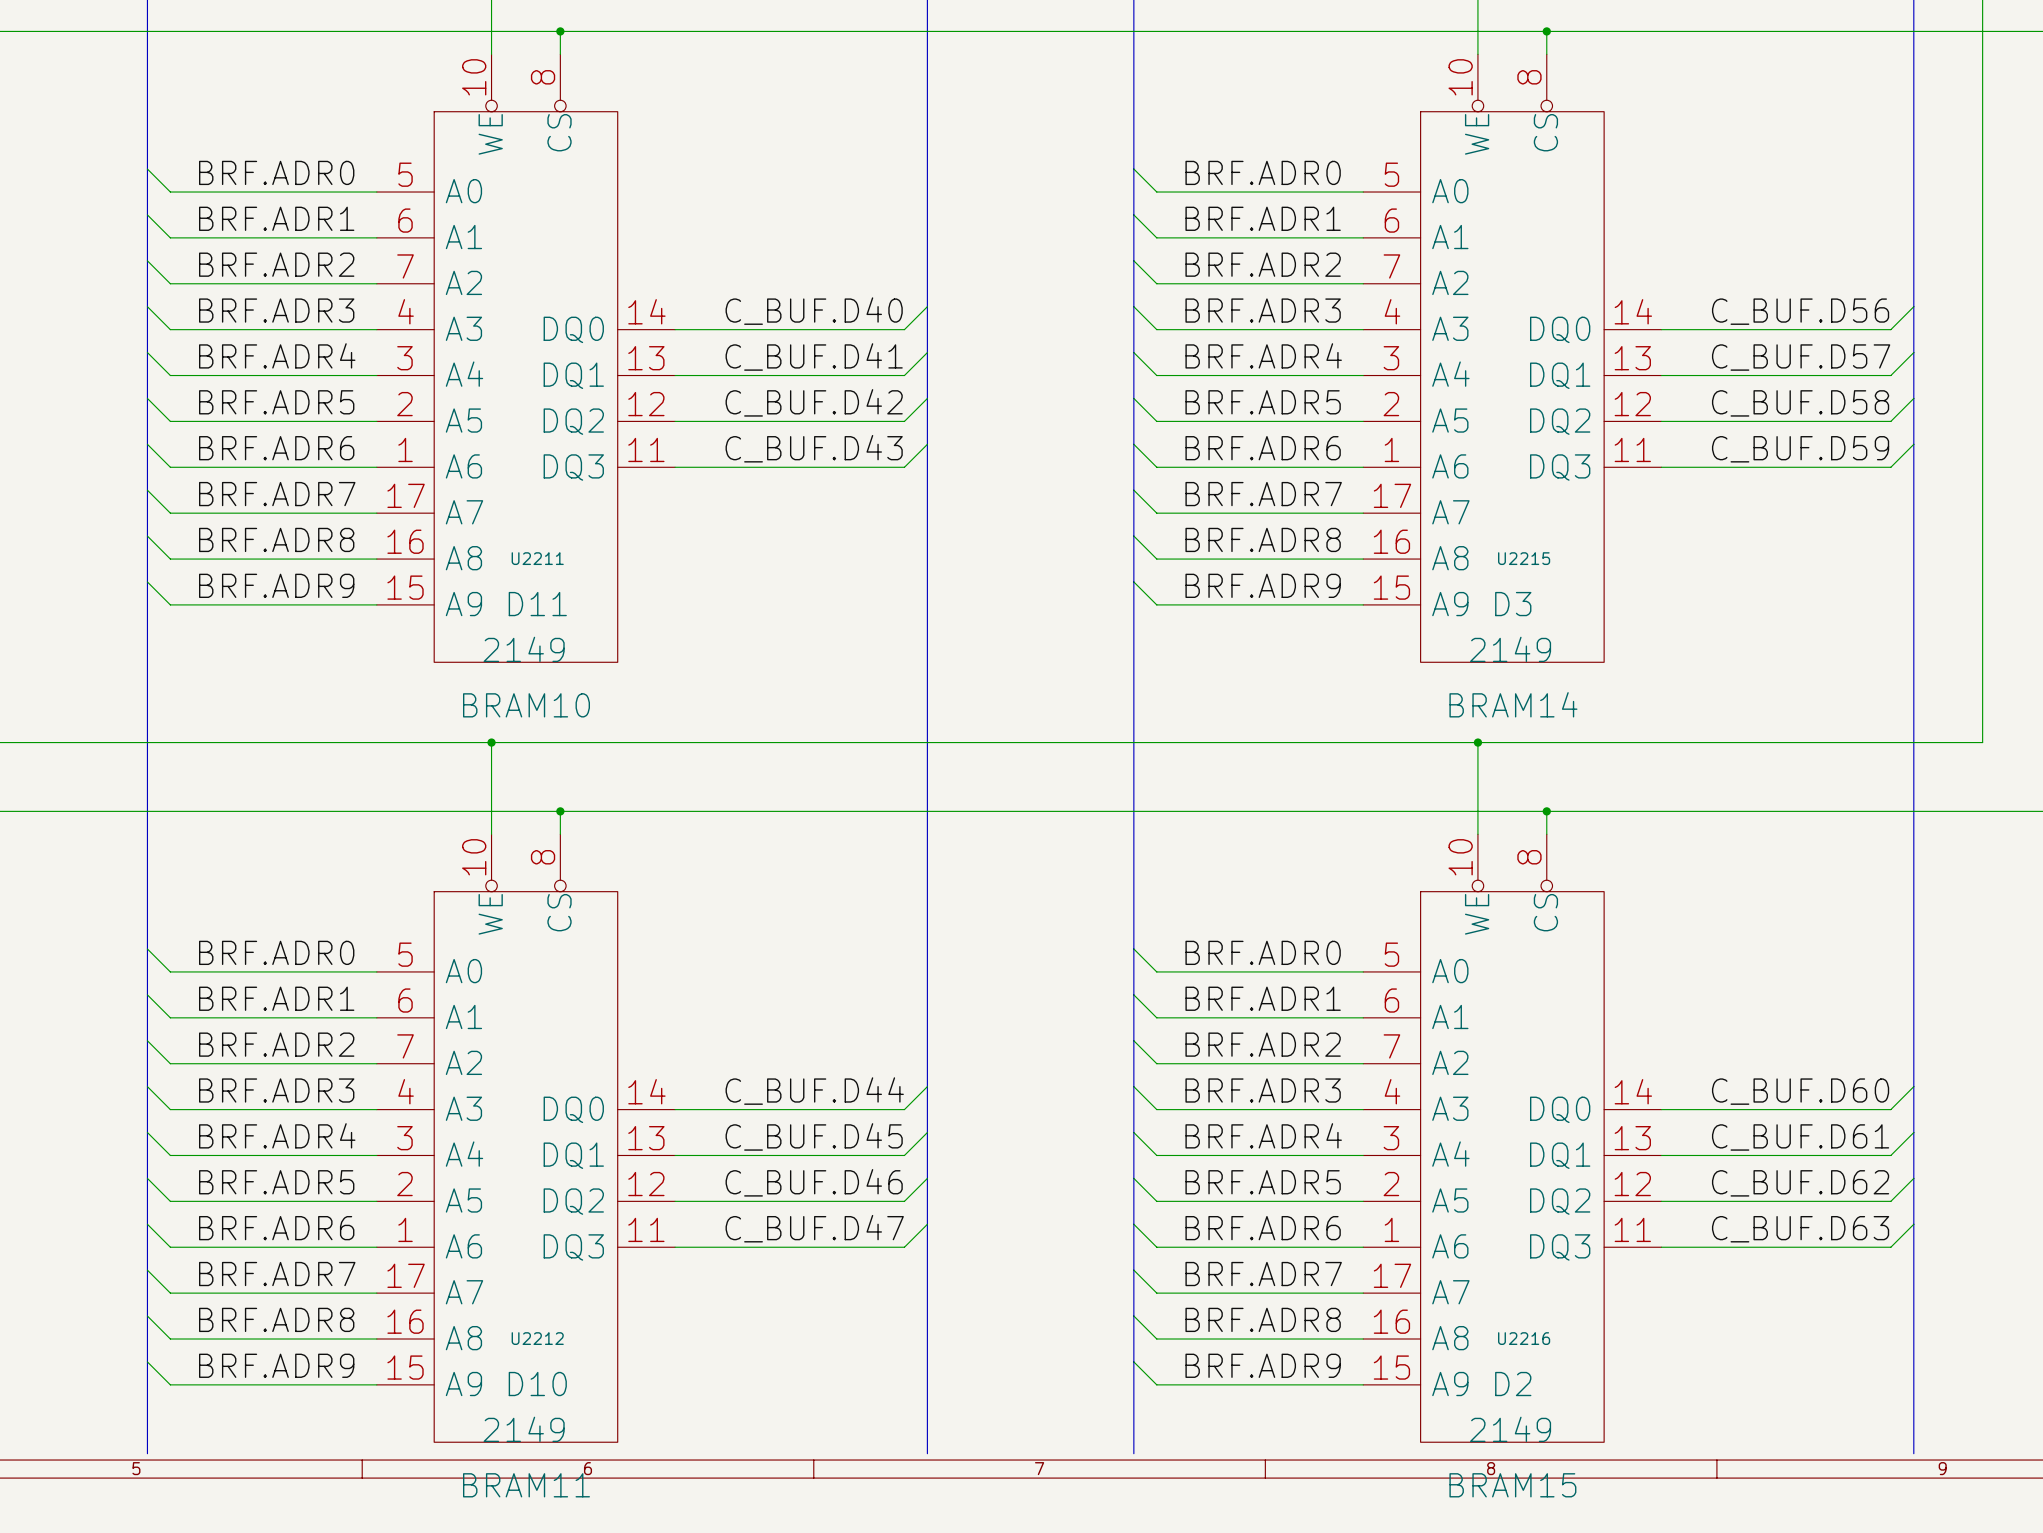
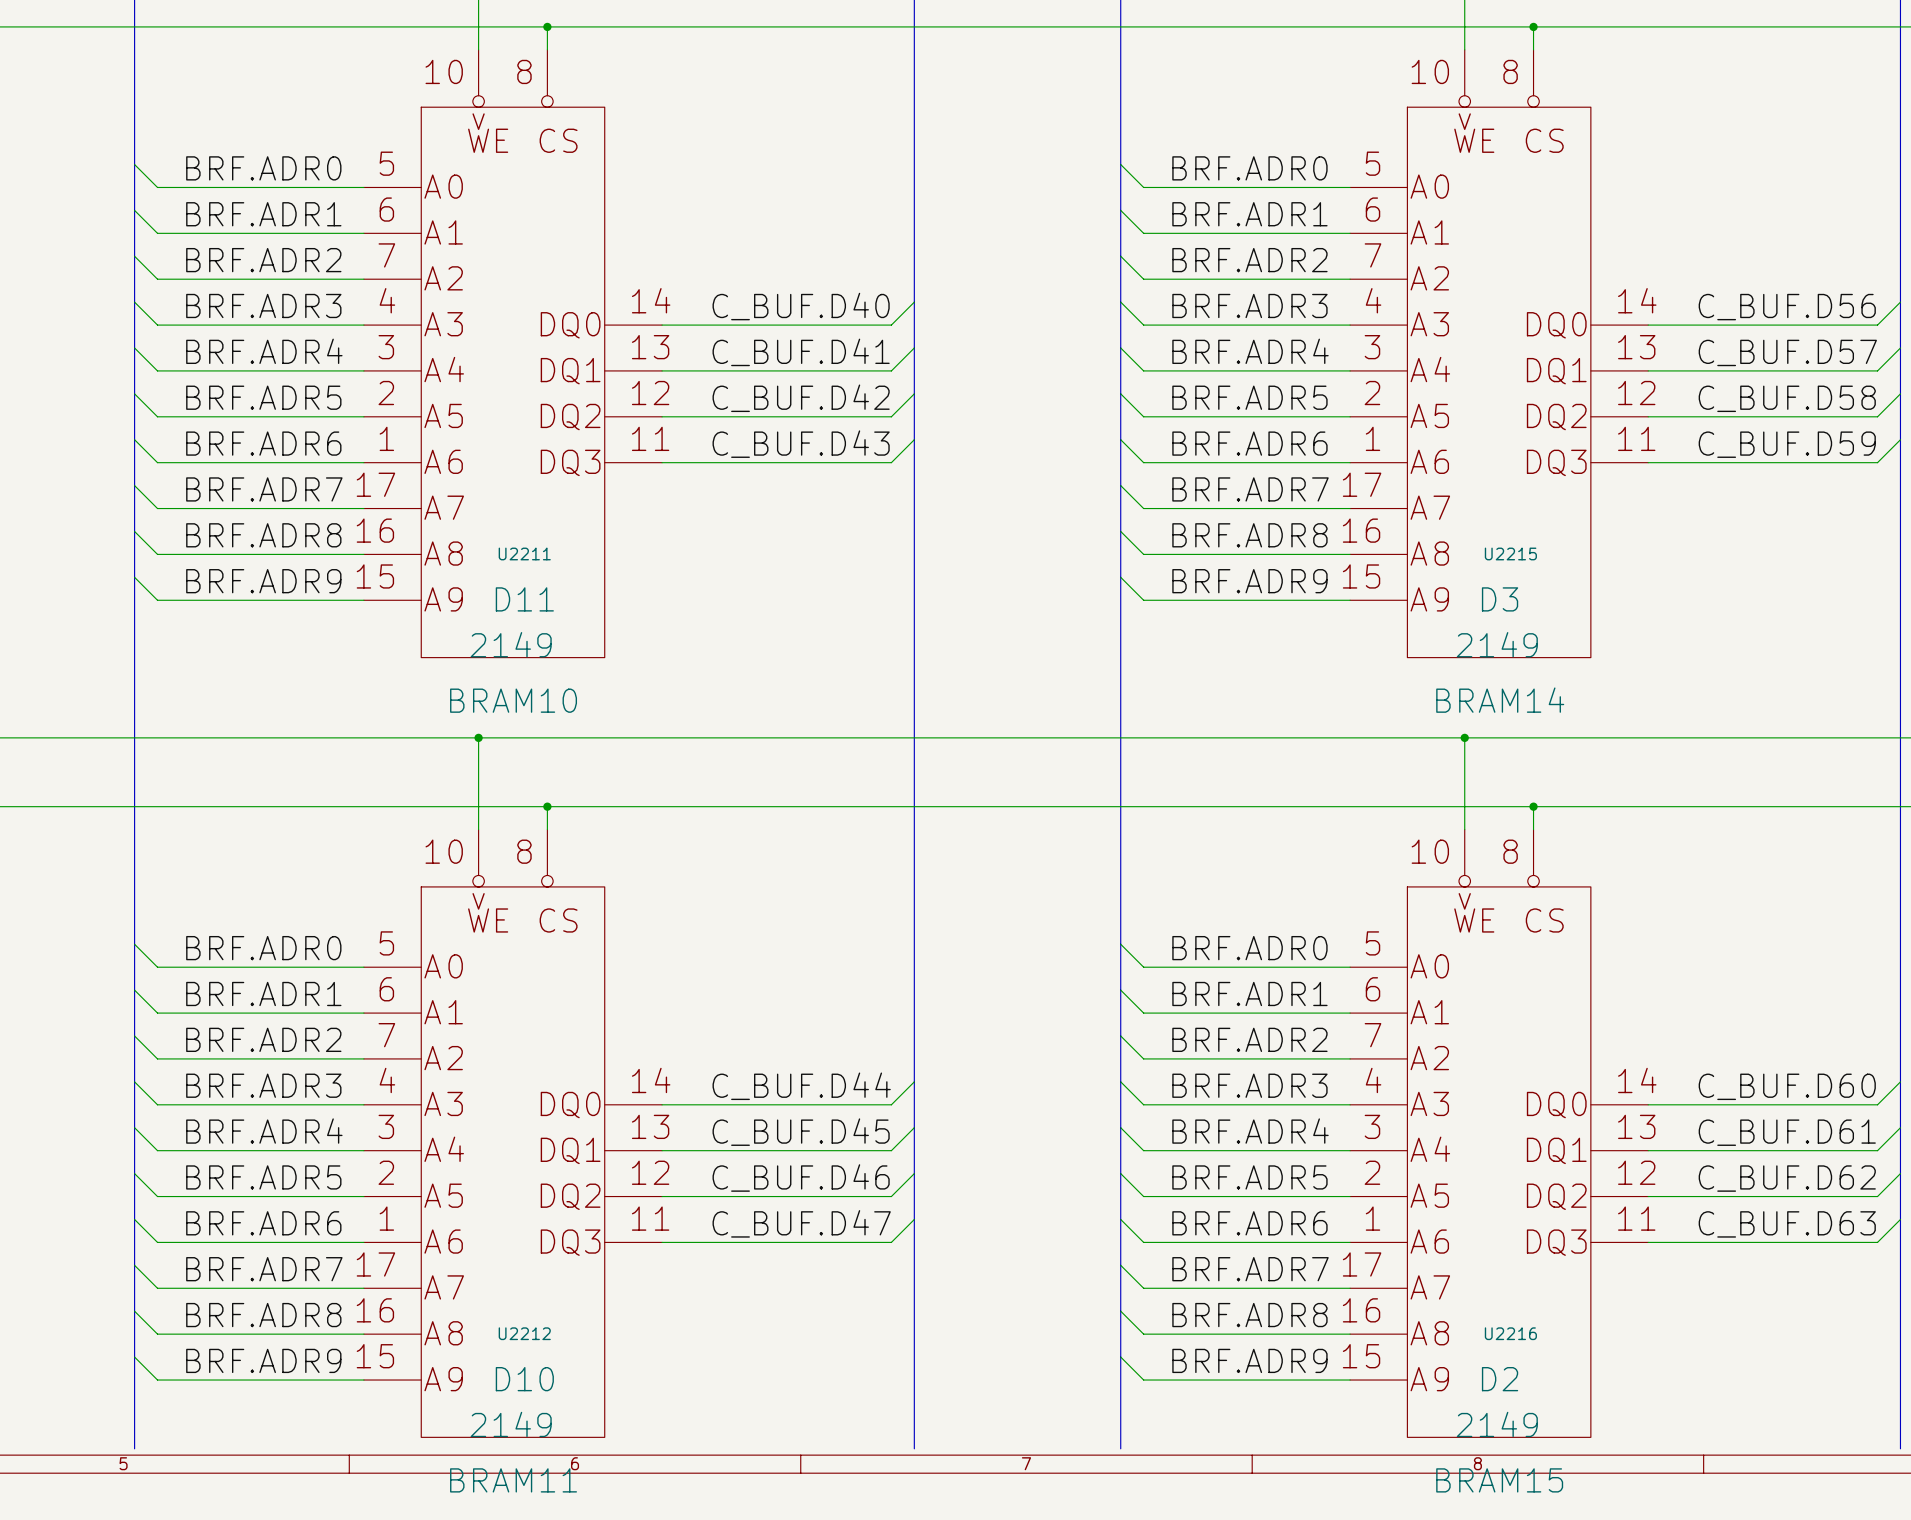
U2211 symbol: [376, 54, 676, 663] -> [363, 49, 663, 658]
U2215 symbol: [1363, 54, 1662, 663] -> [1350, 49, 1649, 658]
U2212 symbol: [376, 834, 676, 1443] -> [363, 829, 663, 1438]
U2216 symbol: [1363, 834, 1662, 1443] -> [1350, 829, 1649, 1438]

